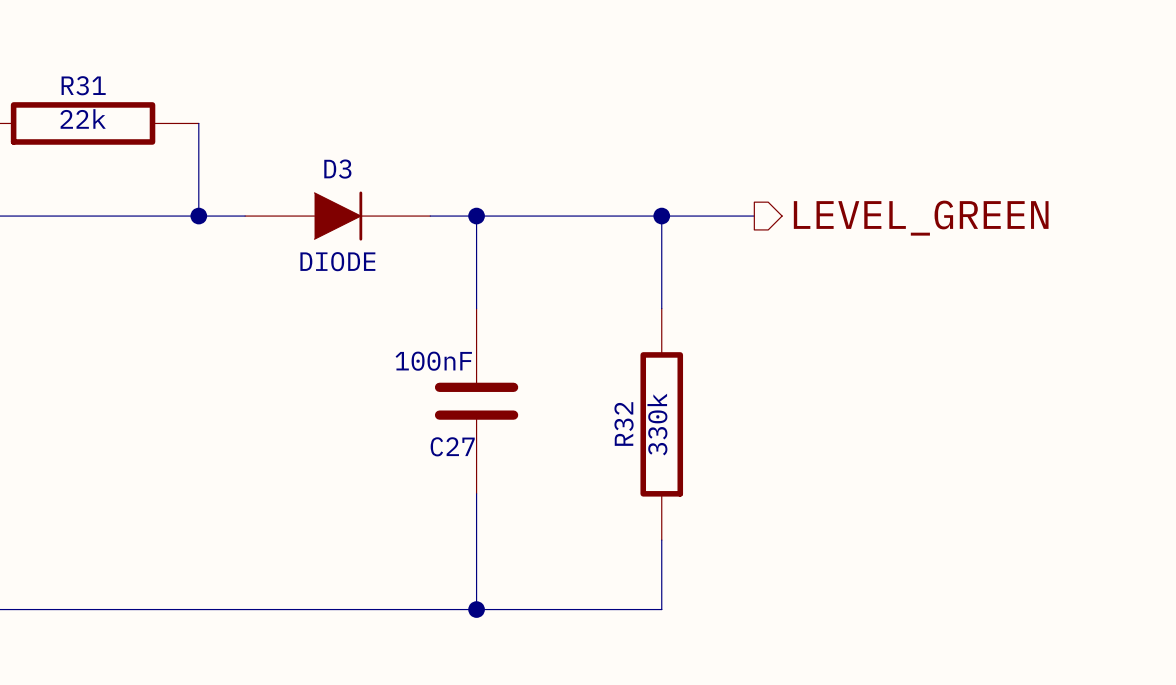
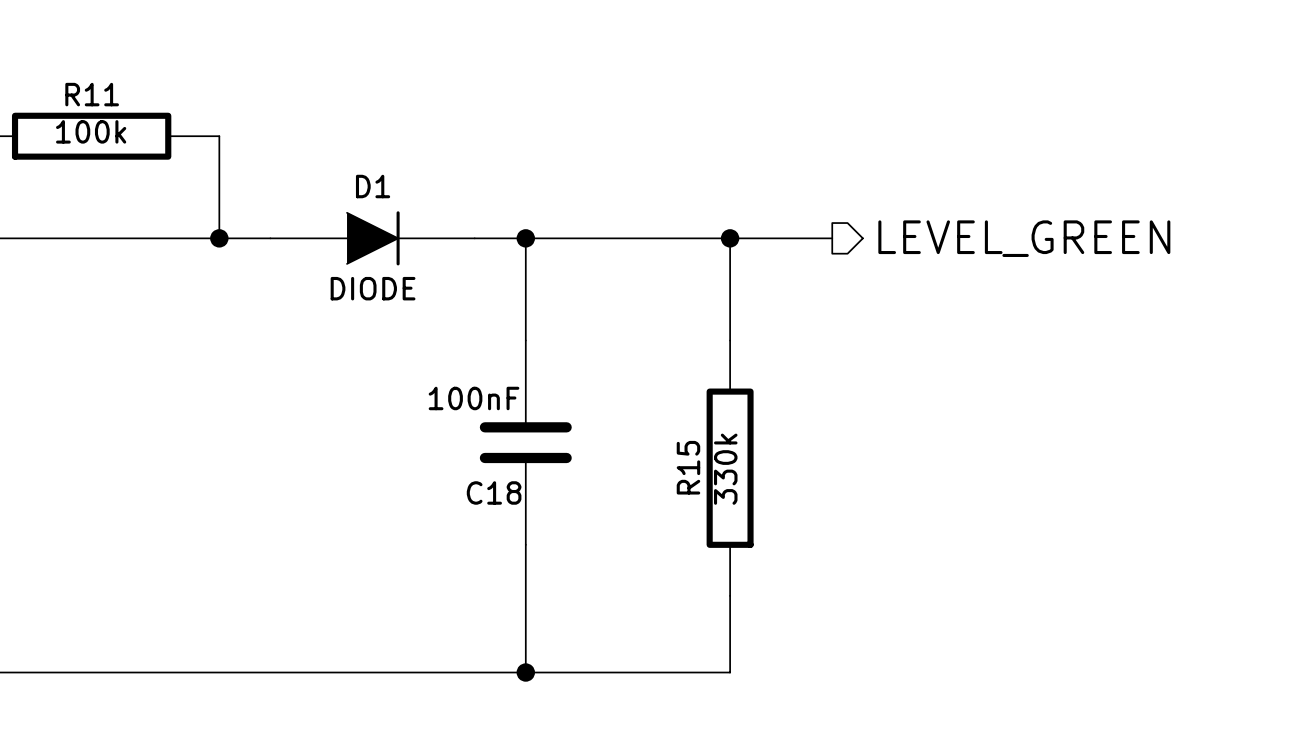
R31 name: R31 (83, 85) -> R11 (92, 94)
R31 value: 22k (83, 118) -> 100k (91, 131)
D3 name: D3 (337, 169) -> D1 (373, 186)
R32 name: R32 (624, 424) -> R15 (688, 467)
C27 name: C27 (452, 446) -> C18 (494, 492)

